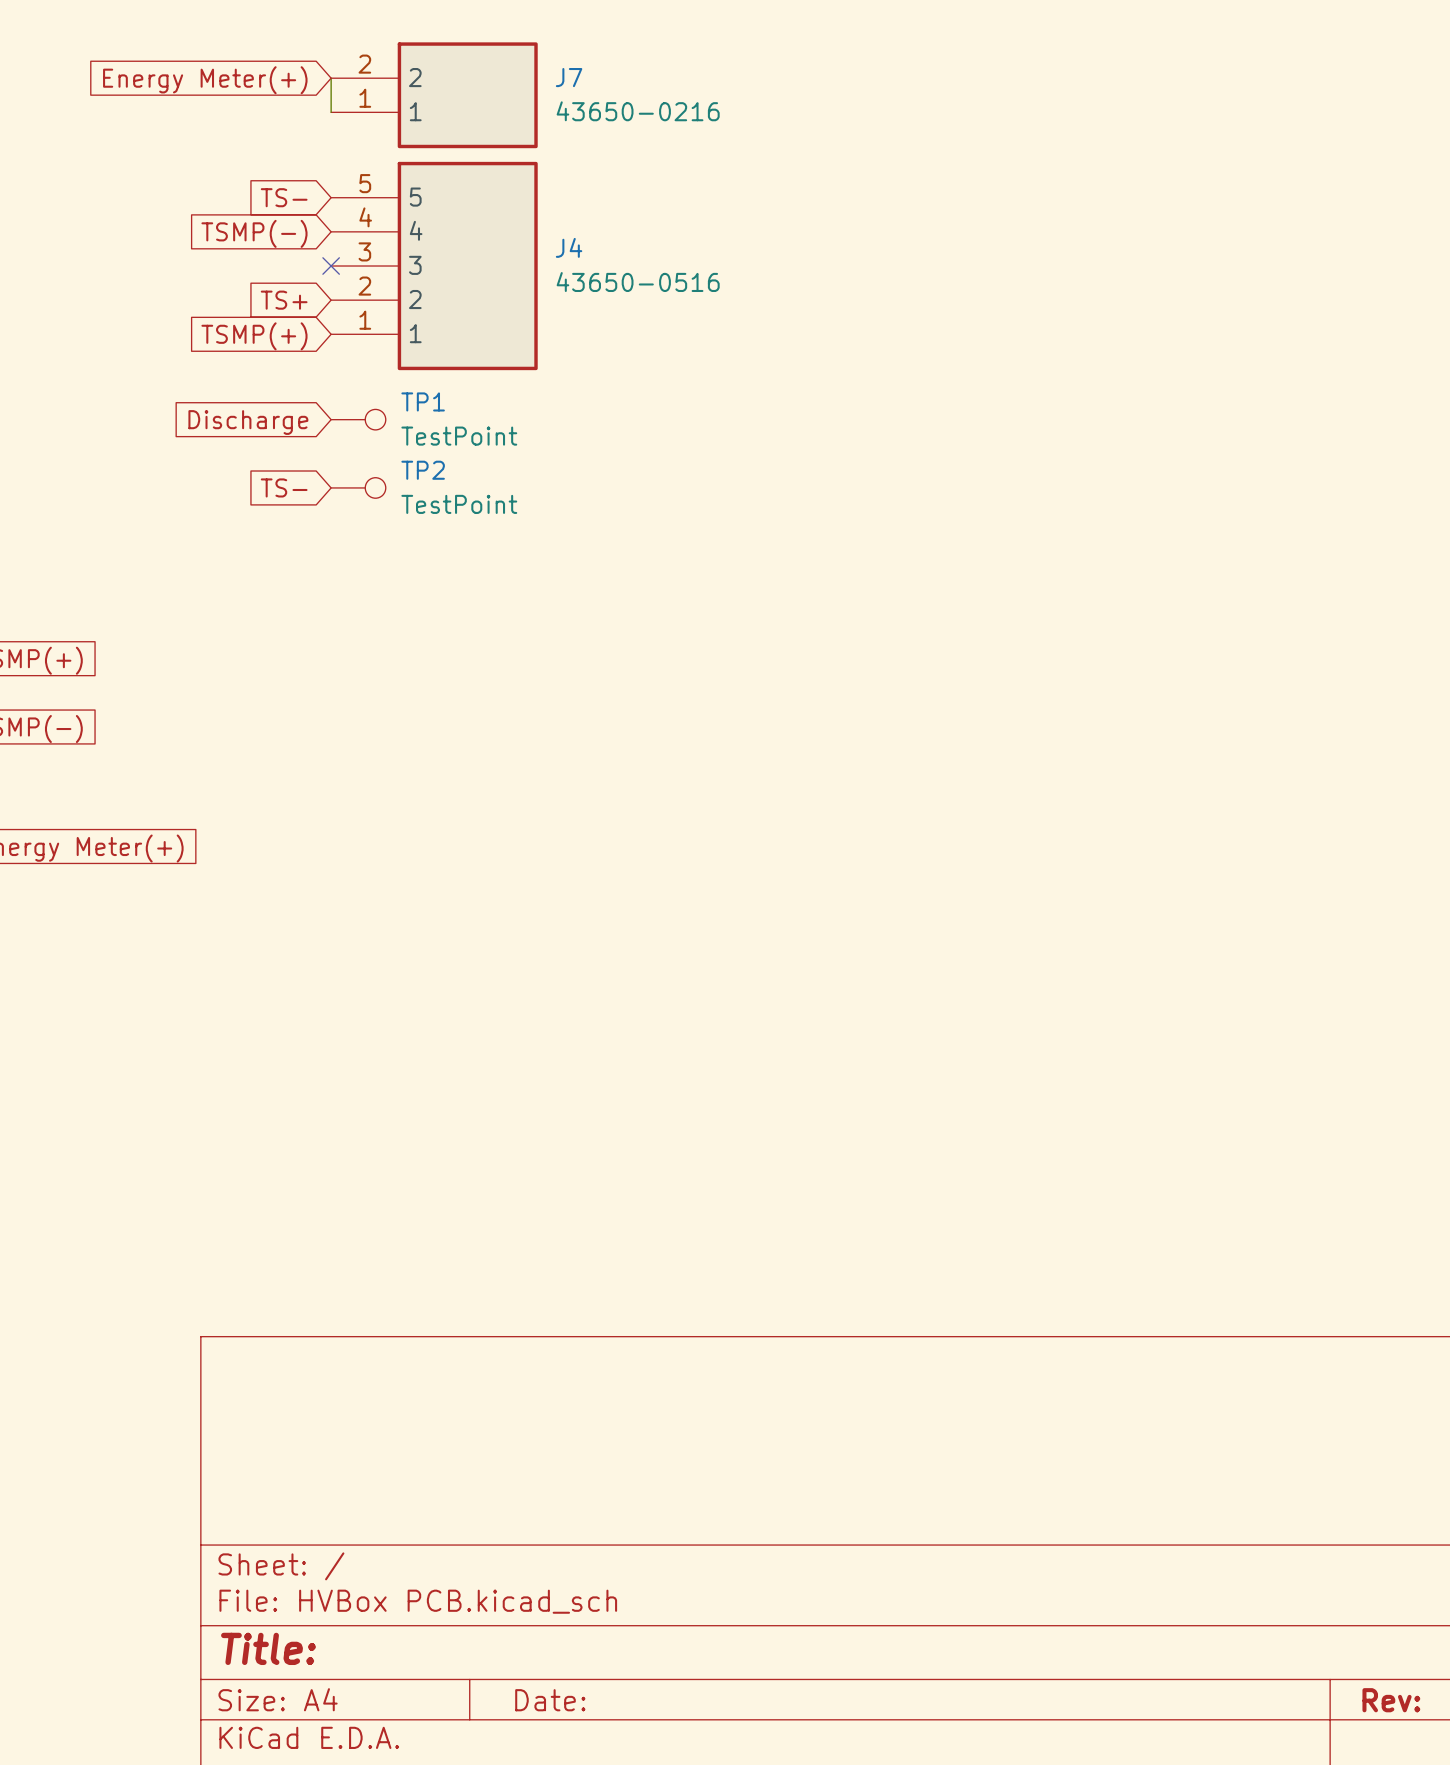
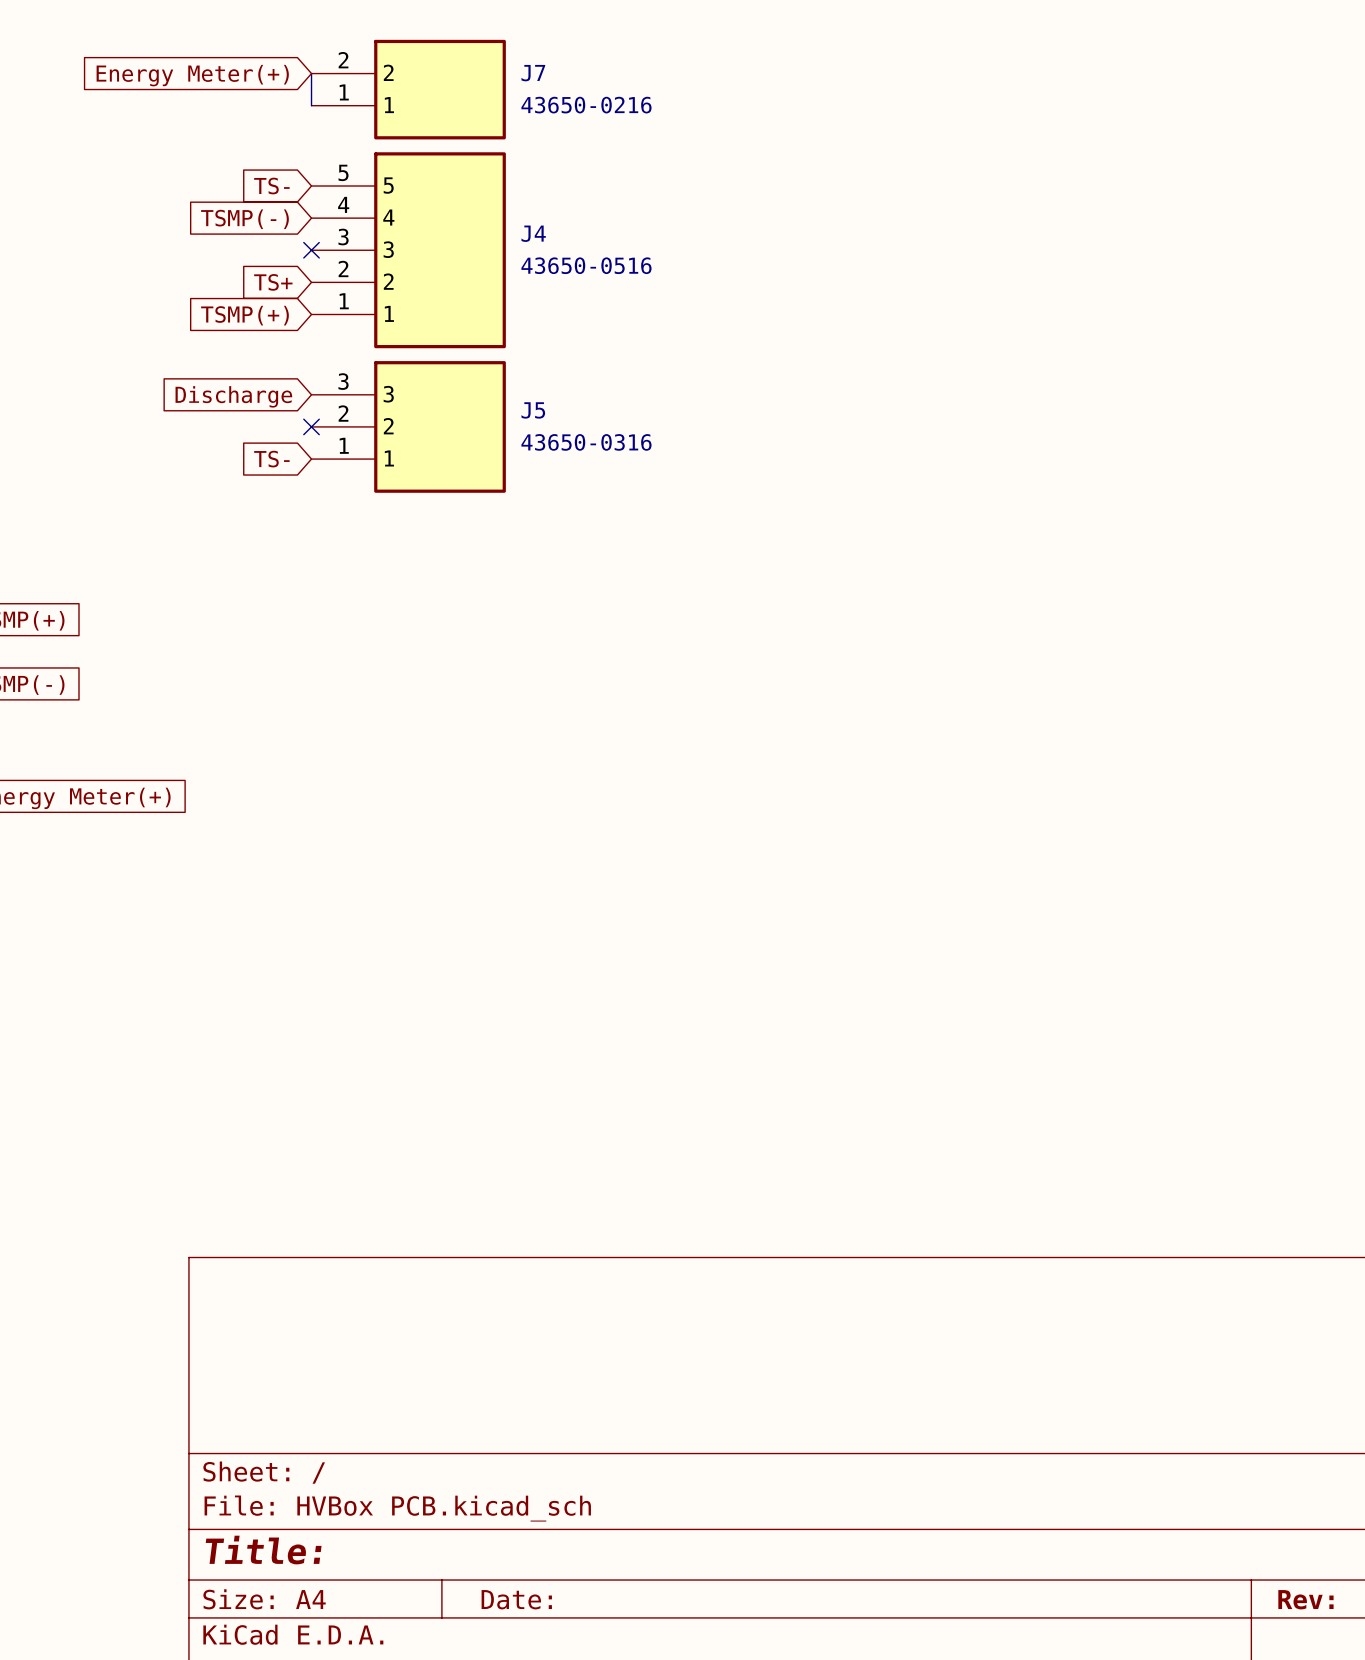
TP1: TestPoint (358, 419) -> none
no-connect mark: none -> (311, 426)
J5: none -> 43650-0316 (408, 426)
TP2: TestPoint (358, 487) -> none

